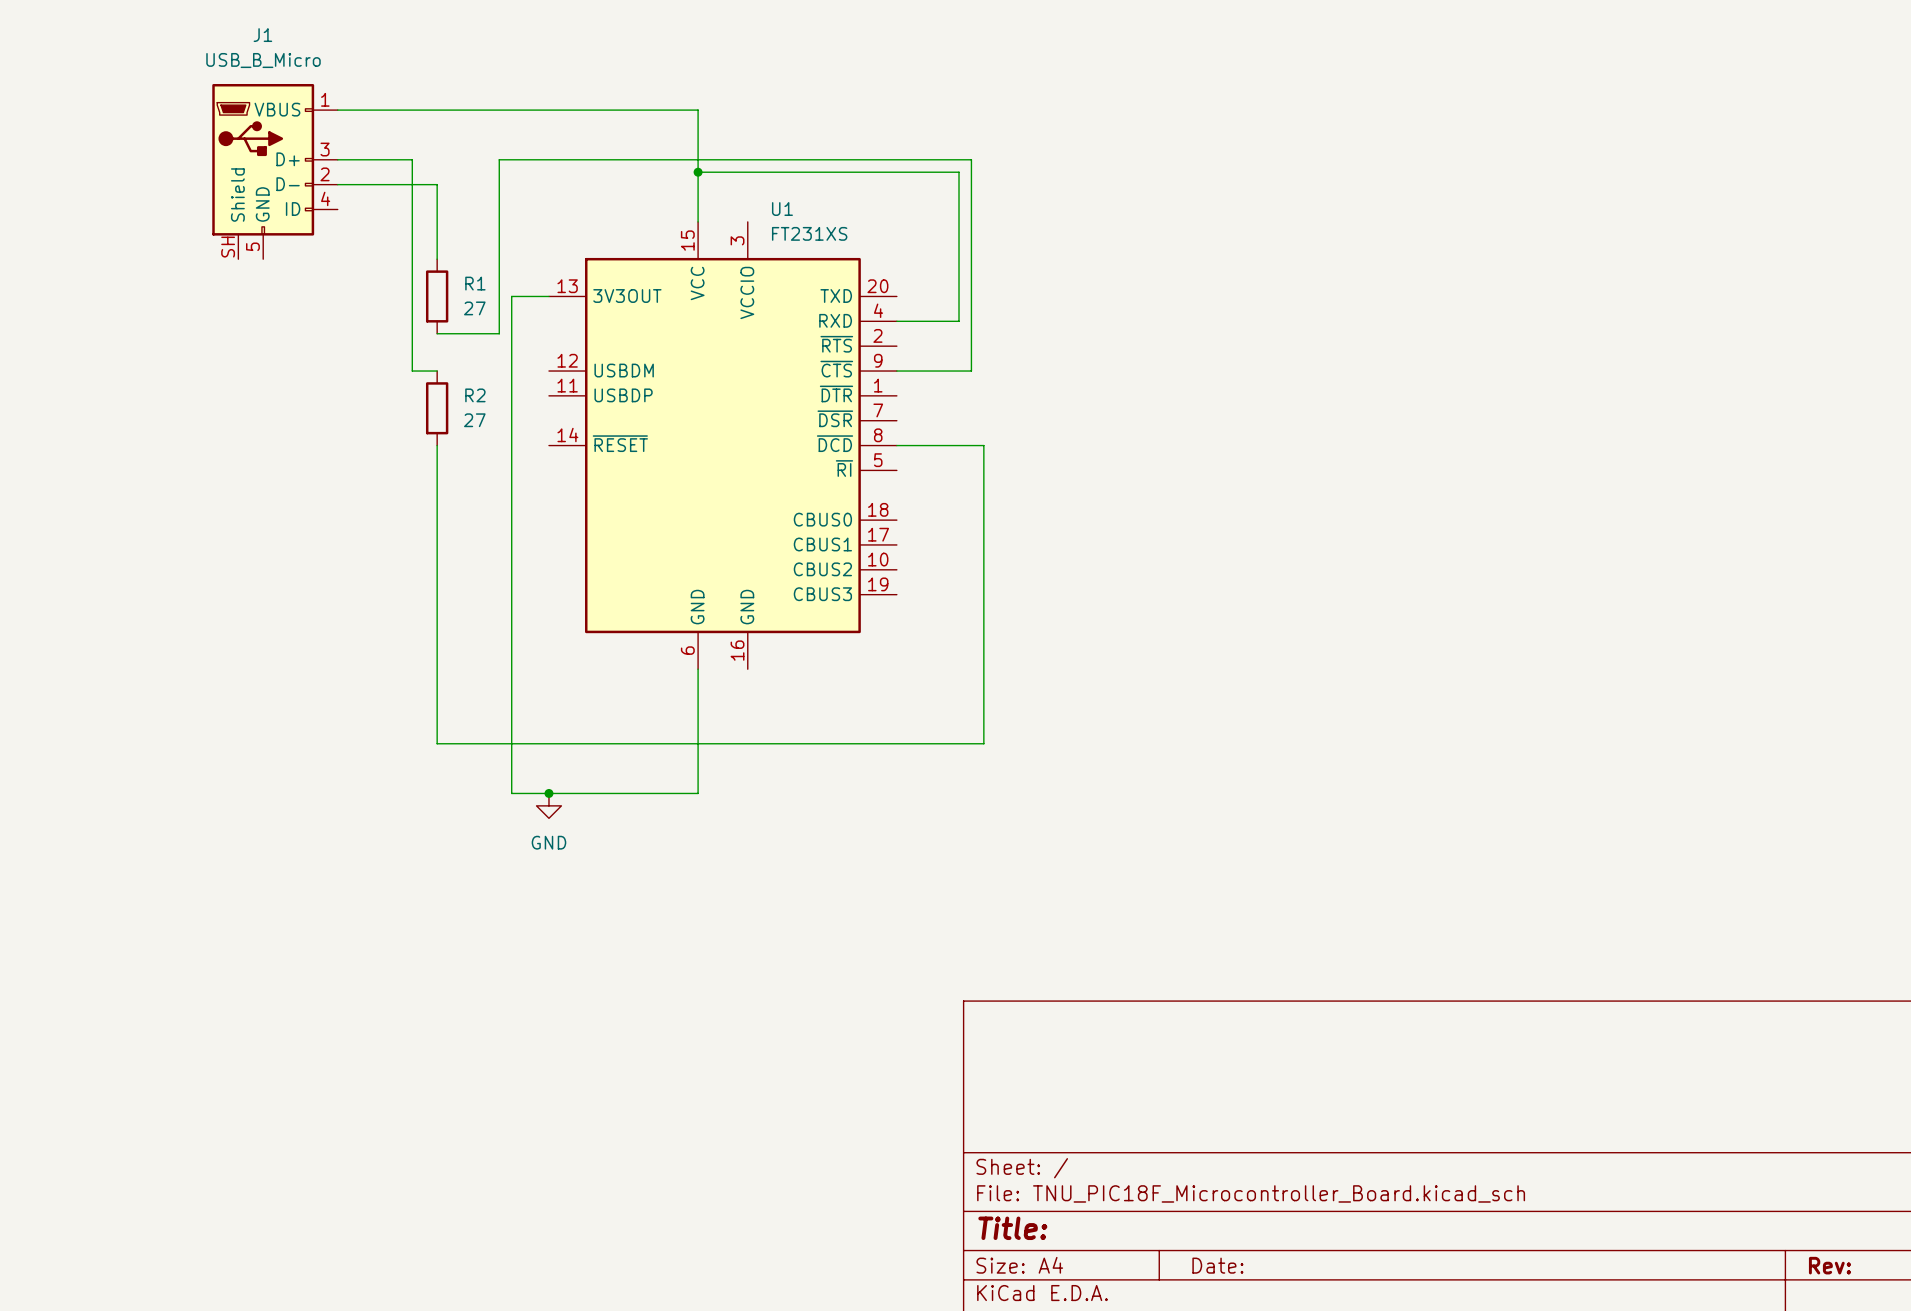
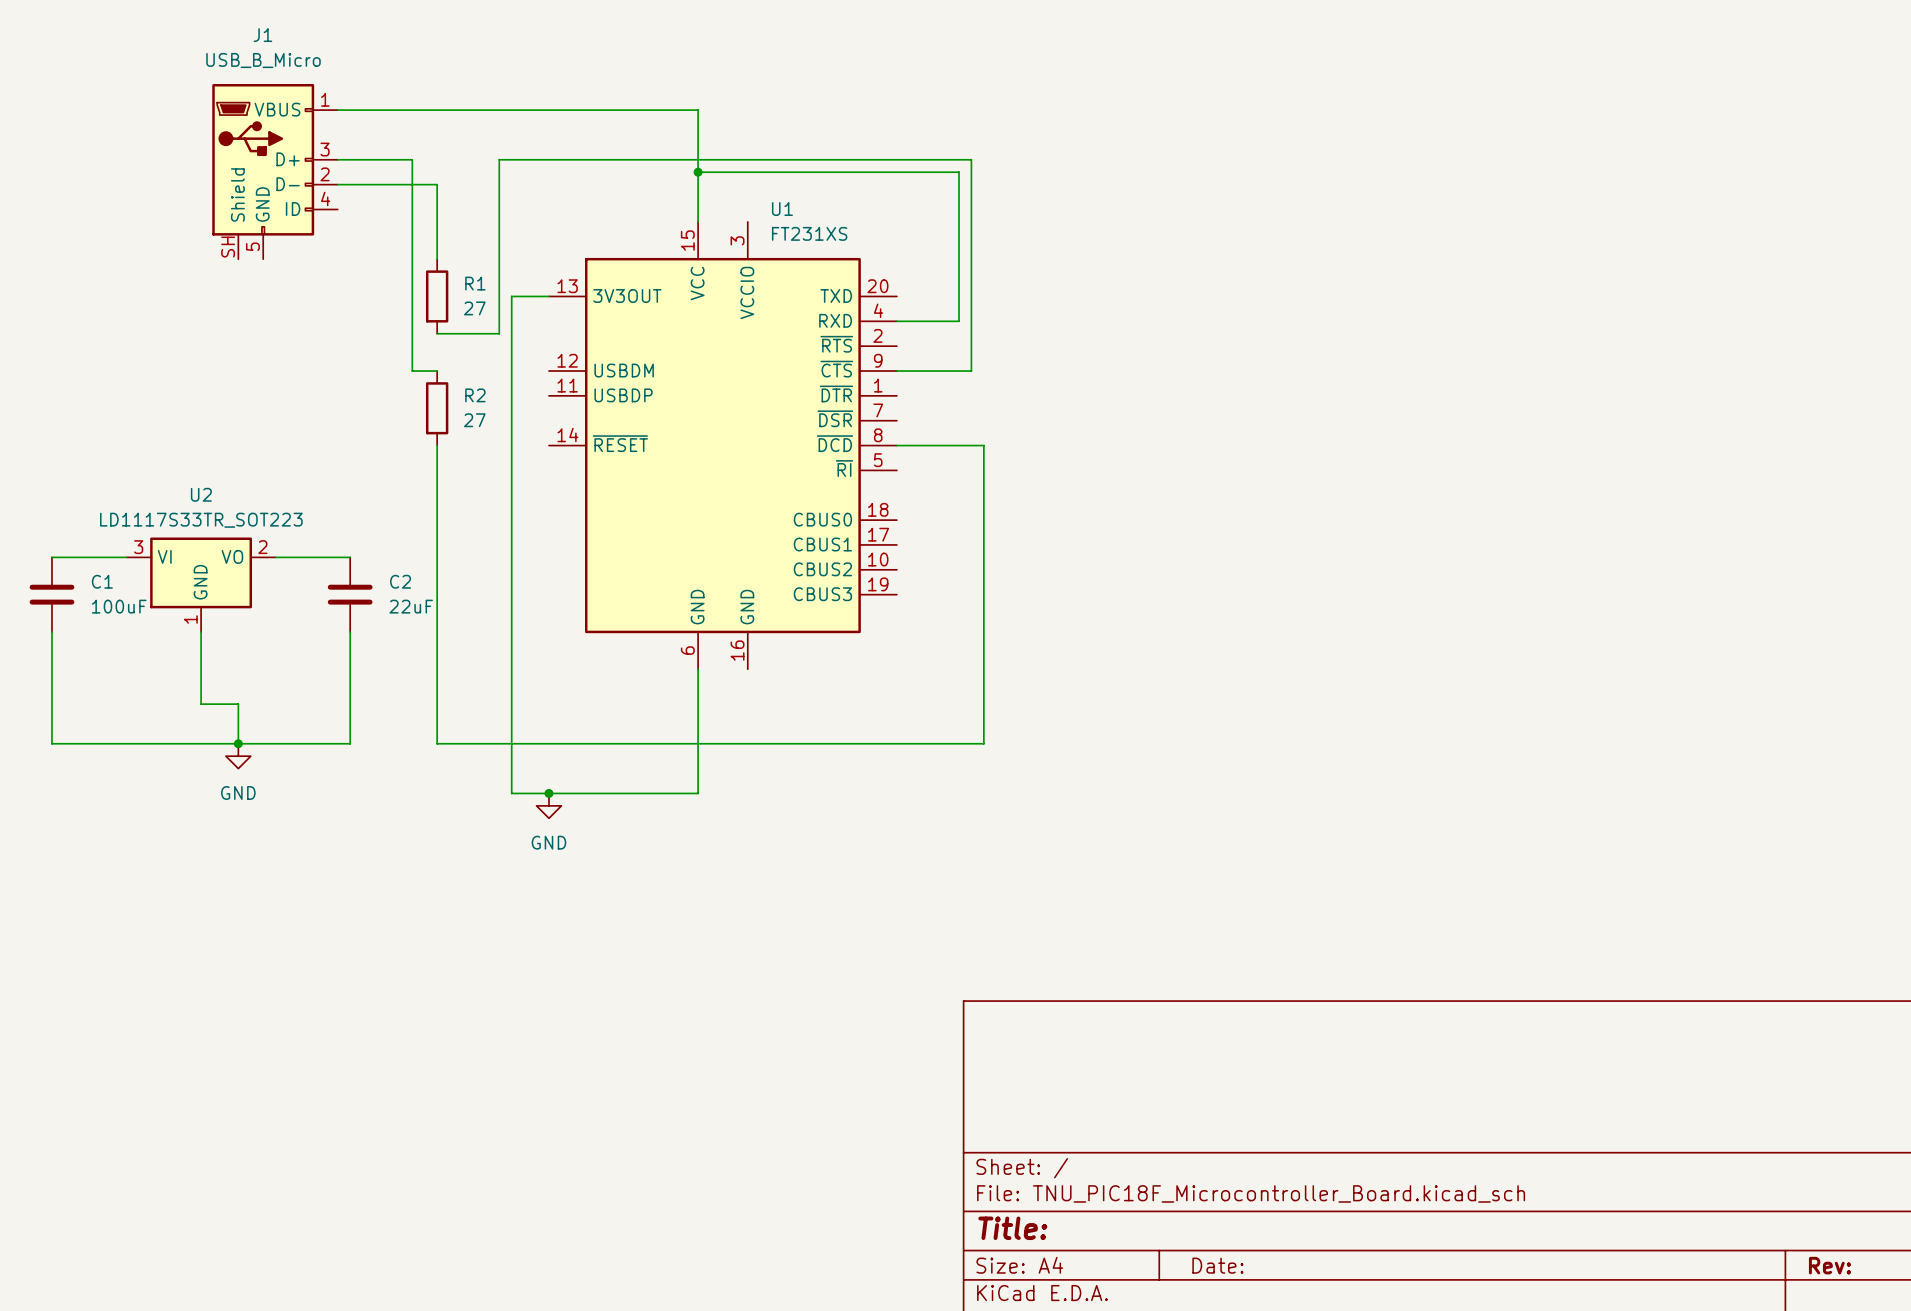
wire: none -> (51, 557) (126, 557)
wire: none -> (275, 557) (350, 557)
U2: none -> LD1117S33TR_SOT223 (201, 584)
C1: none -> 100uF (51, 594)
C2: none -> 22uF (350, 594)
wire: none -> (51, 631) (51, 743) (350, 743) (350, 631)
wire: none -> (201, 631) (201, 704) (238, 704) (238, 743)
junction: none -> (238, 743)
power symbol: none -> GND (238, 756)

